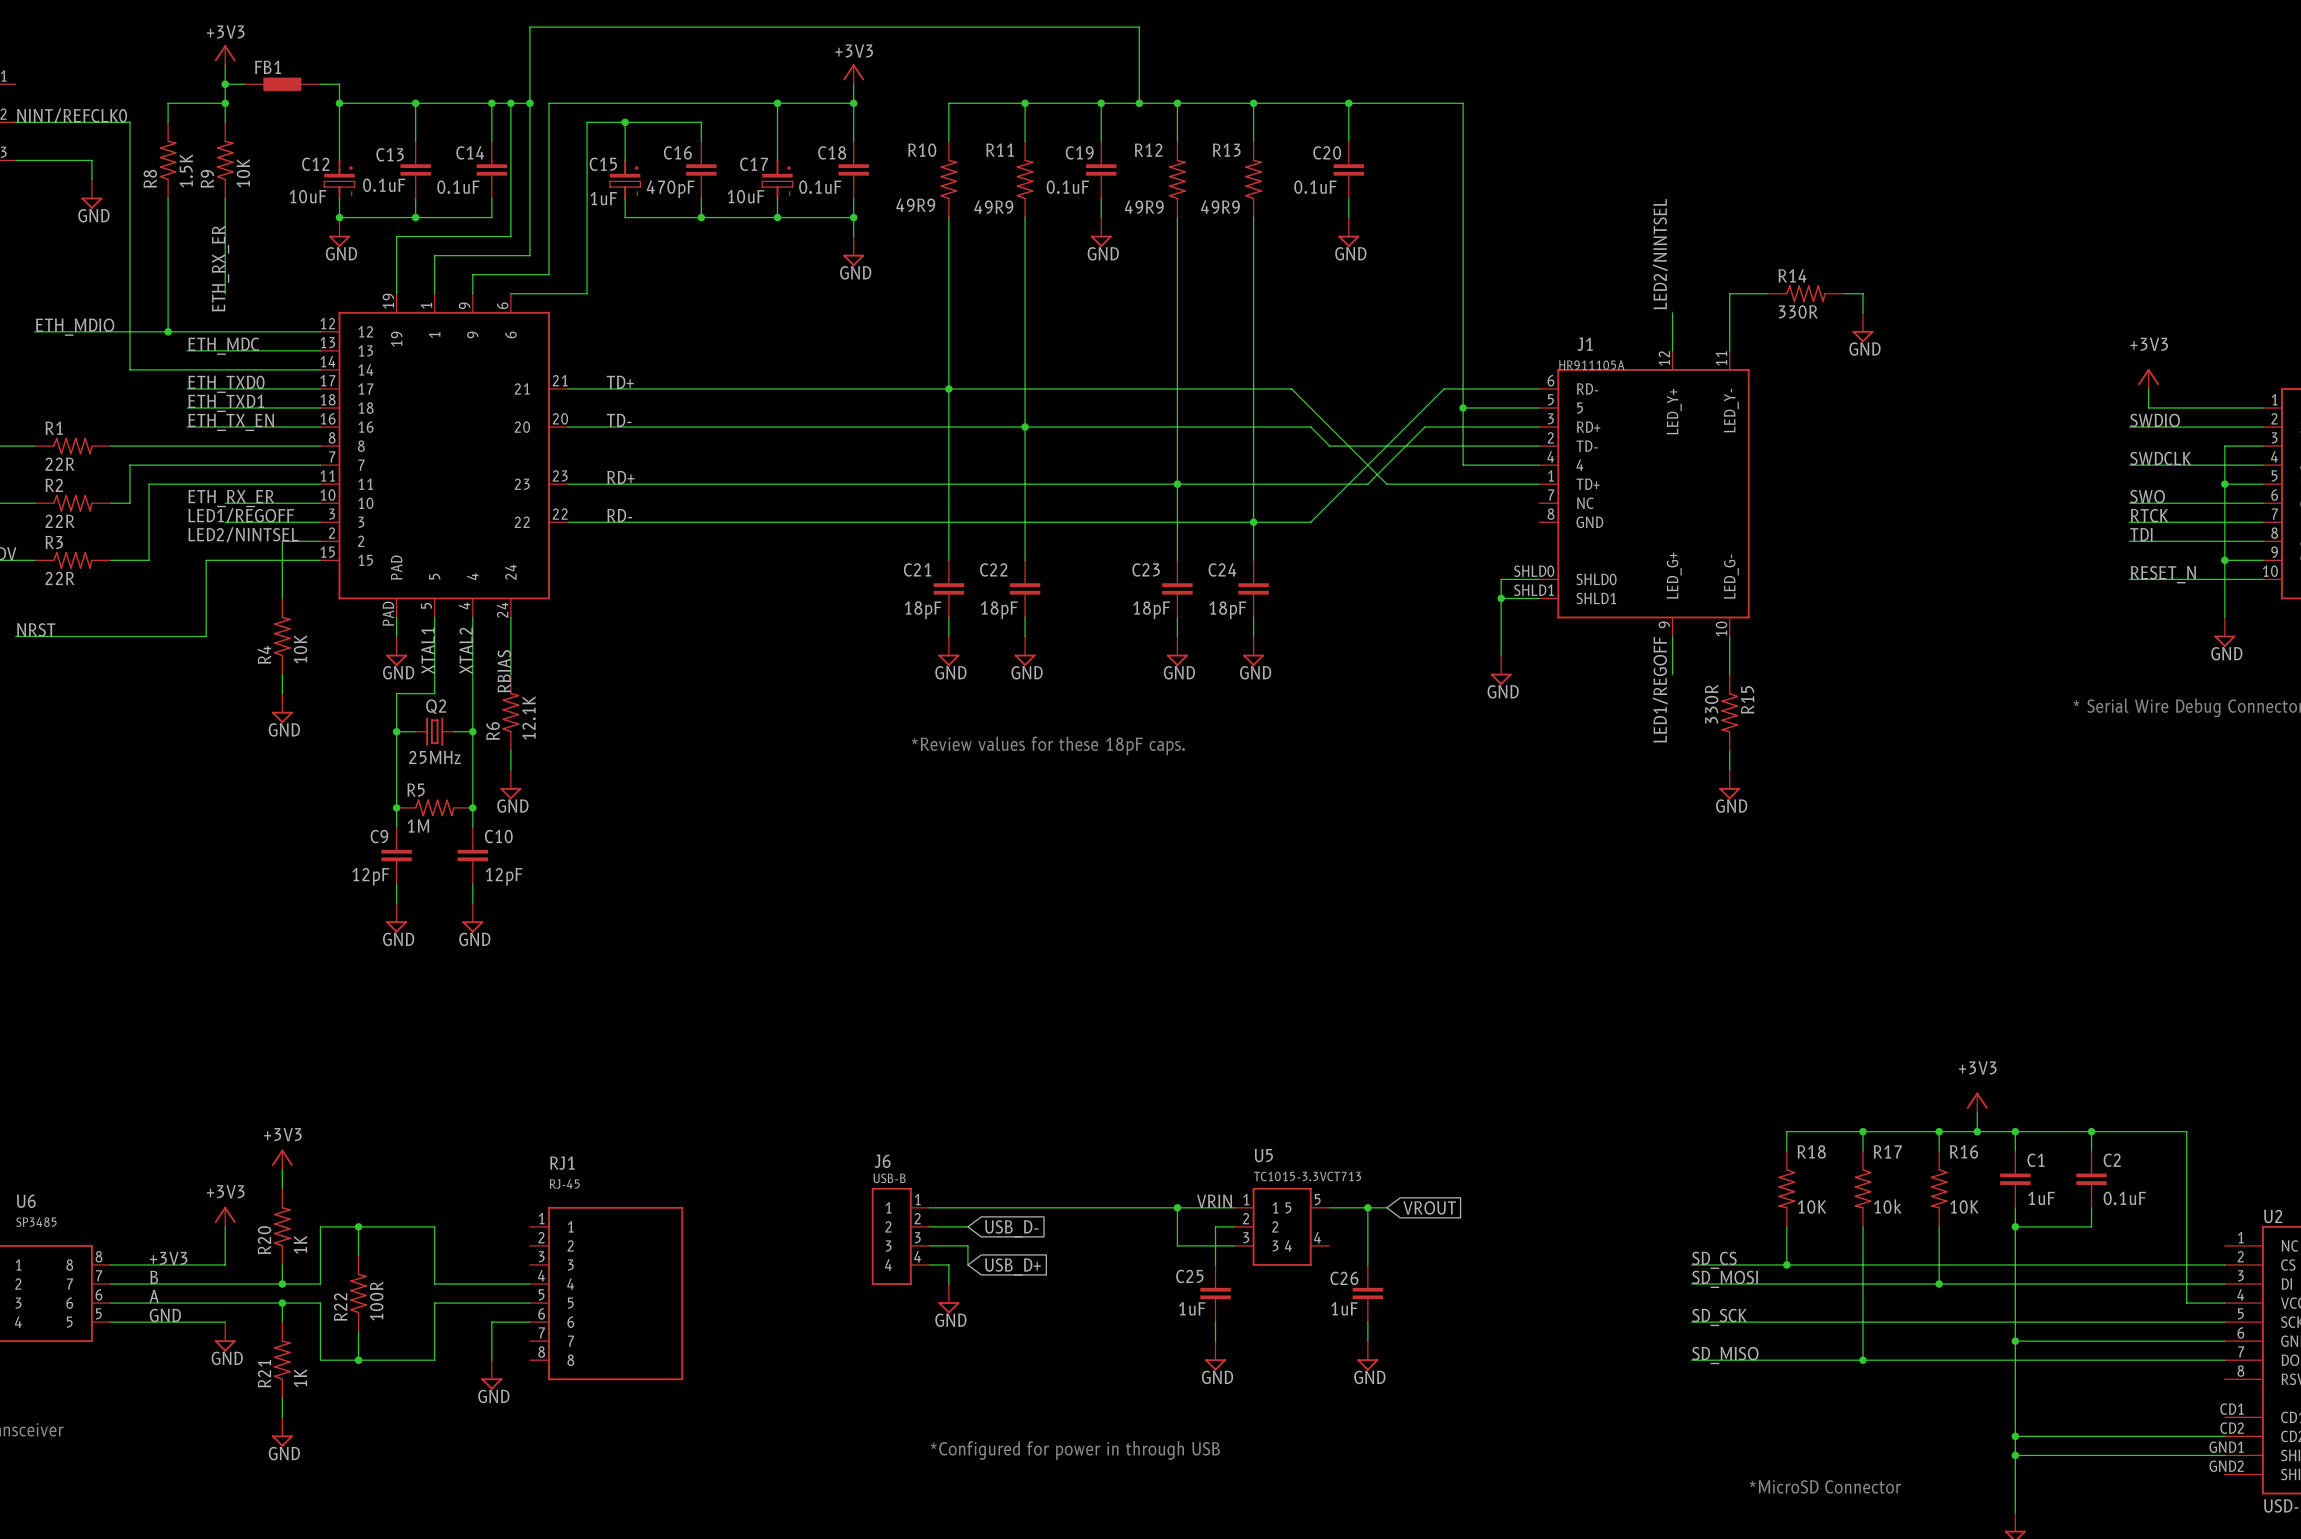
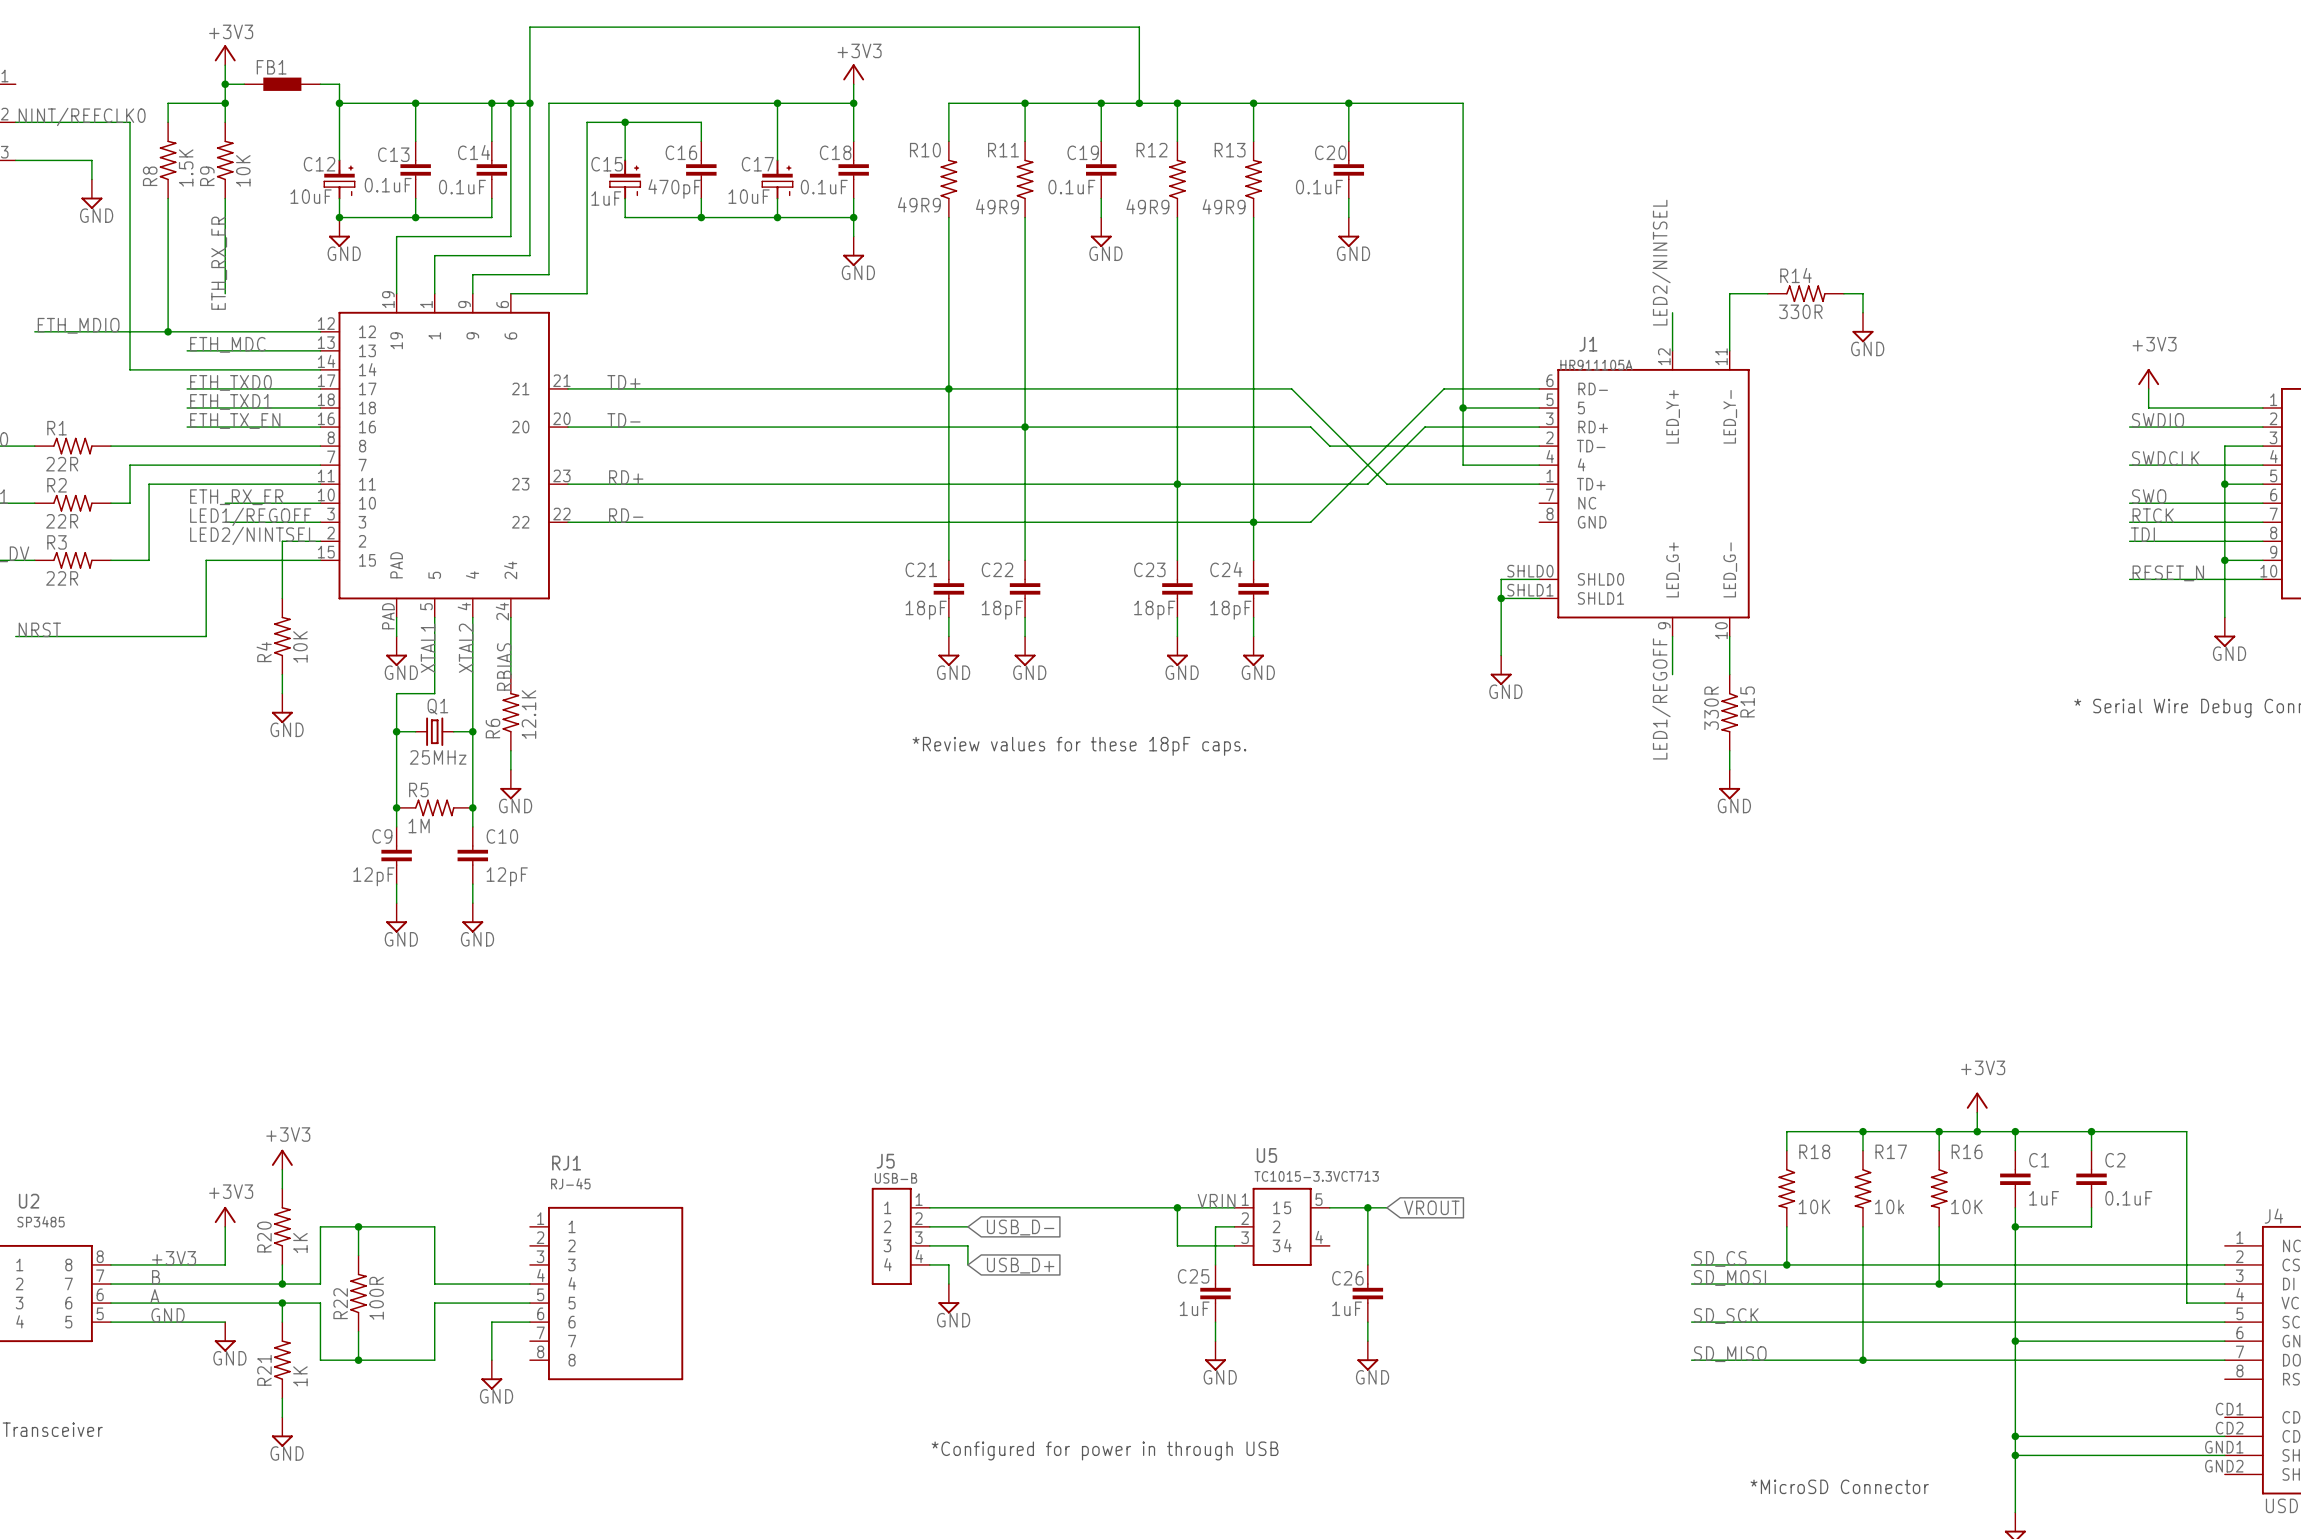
Q2 name: Q2 (436, 706) -> Q1 (437, 706)
J6 name: J6 (882, 1161) -> J5 (885, 1161)
U6 name: U6 (26, 1201) -> U2 (29, 1201)
U2 name: U2 (2273, 1216) -> J4 (2273, 1216)

